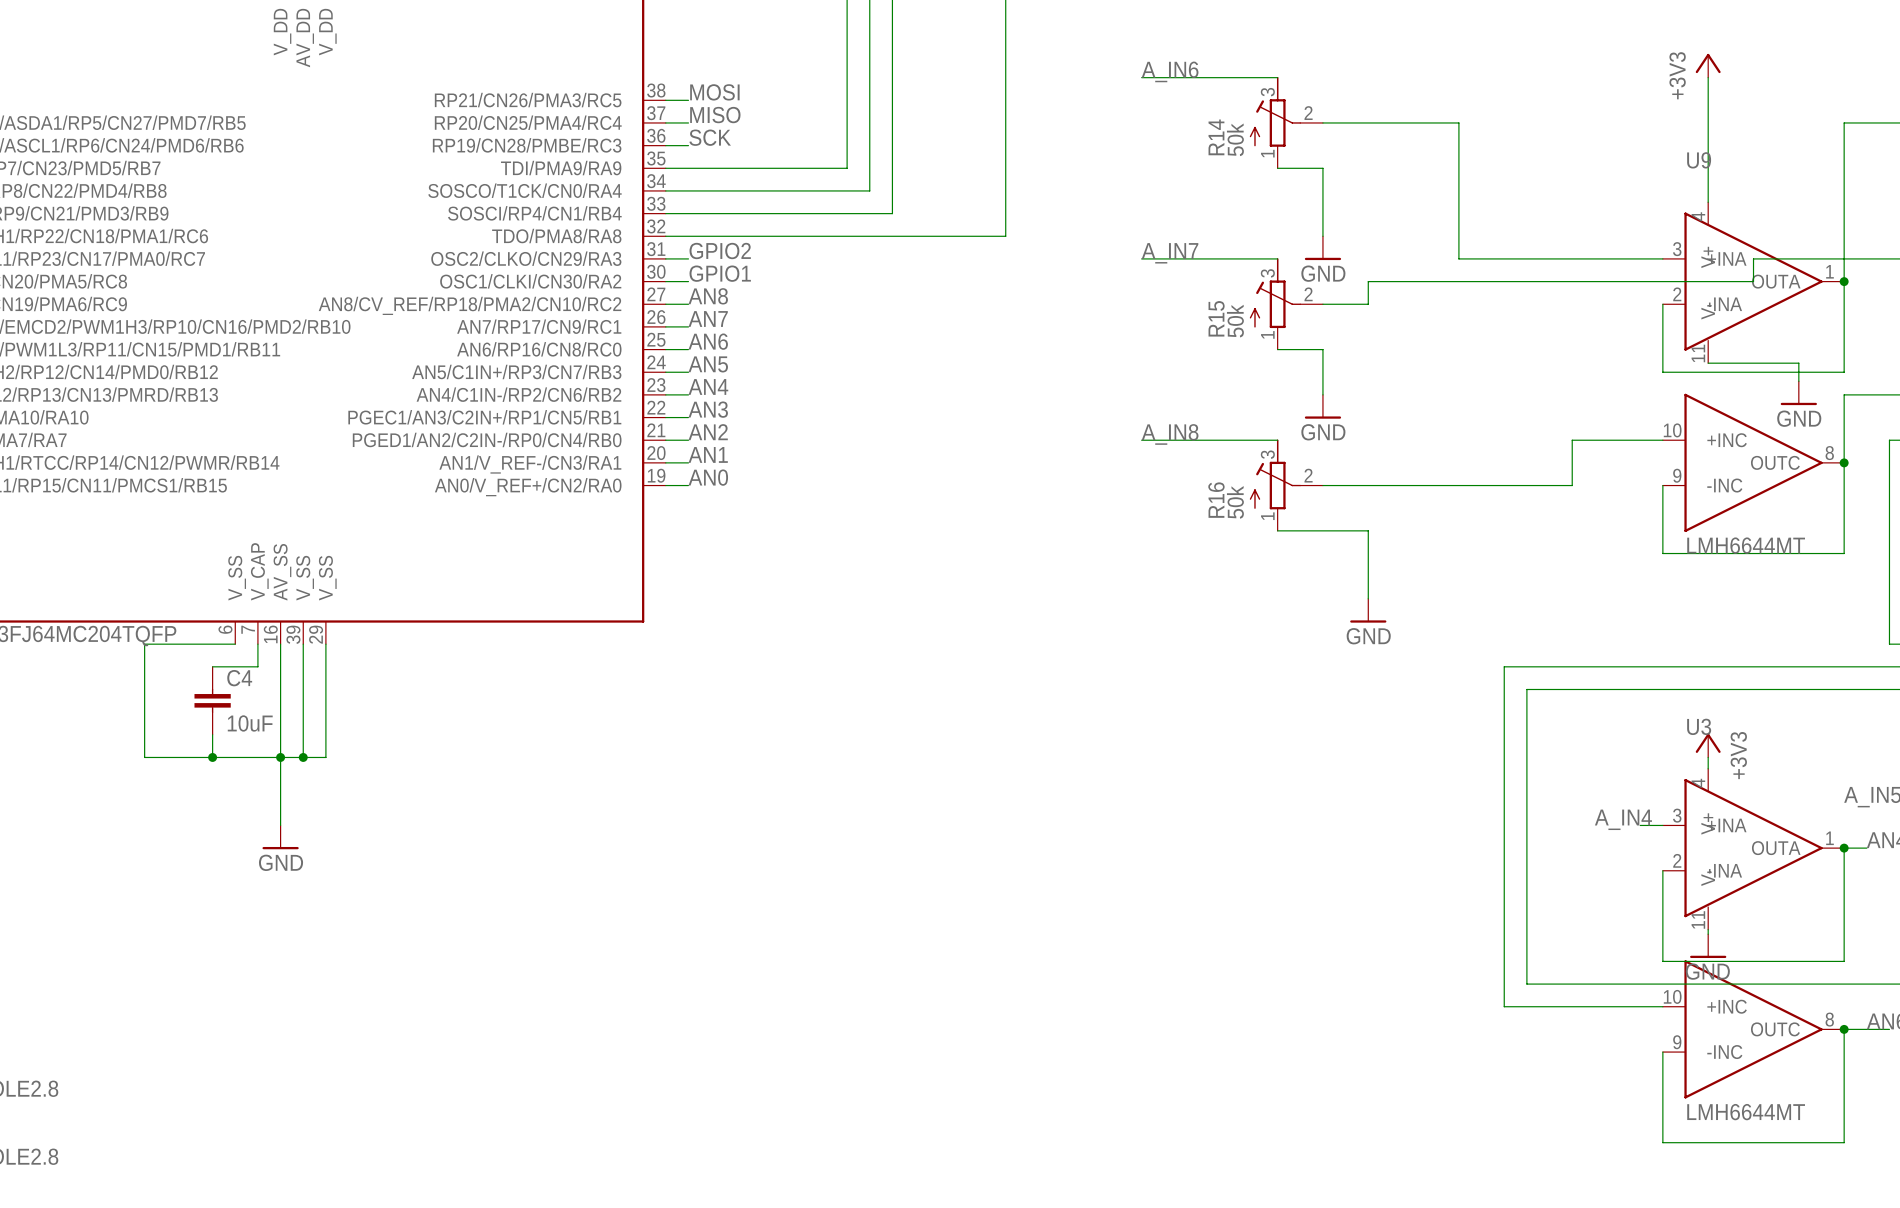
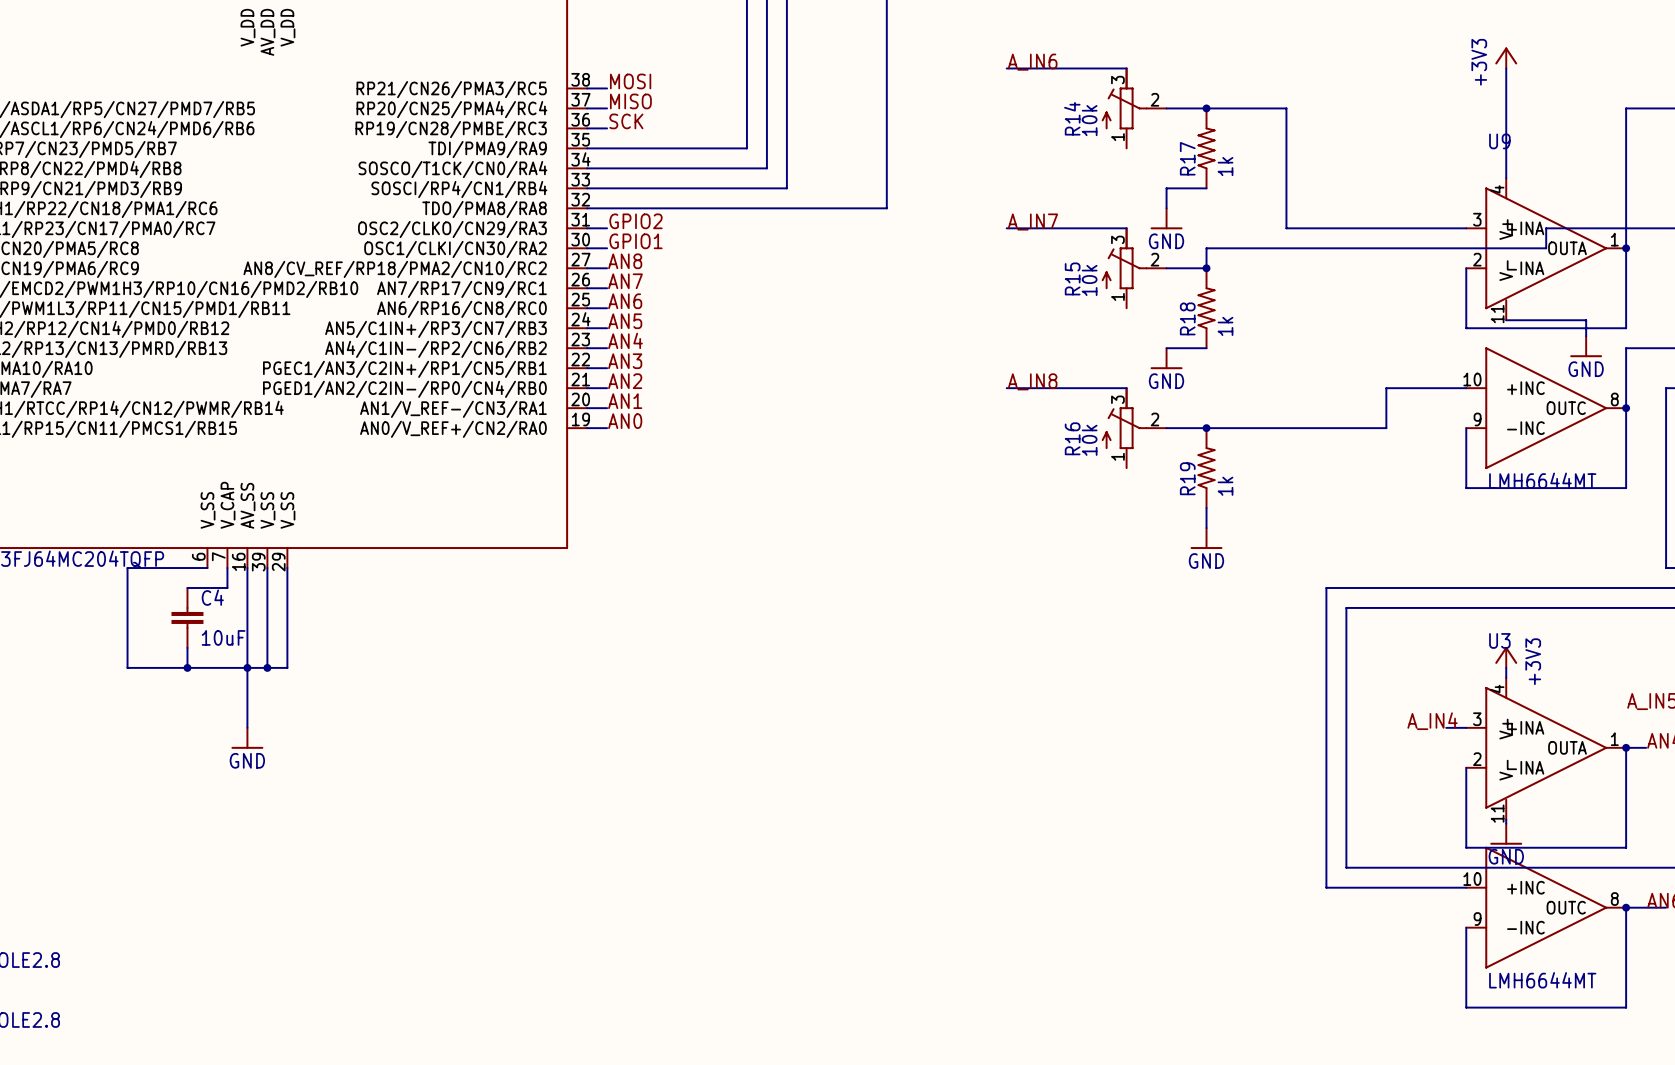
junction: none -> (1206, 108)
R14 value: 50k (1235, 139) -> 10k (1089, 120)
wire: (1277, 168) (1322, 168) (1322, 213) -> (1206, 188) (1166, 188)
R17: none -> 1k (1206, 148)
junction: none -> (1206, 268)
R15 value: 50k (1235, 321) -> 10k (1089, 280)
wire: (1277, 349) (1322, 349) (1322, 394) -> (1206, 348) (1166, 348)
R18: none -> 1k (1206, 308)
junction: none -> (1206, 428)
R16 value: 50k (1235, 502) -> 10k (1089, 440)
wire: (1277, 530) (1368, 530) (1368, 576) -> none
R19: none -> 1k (1206, 468)

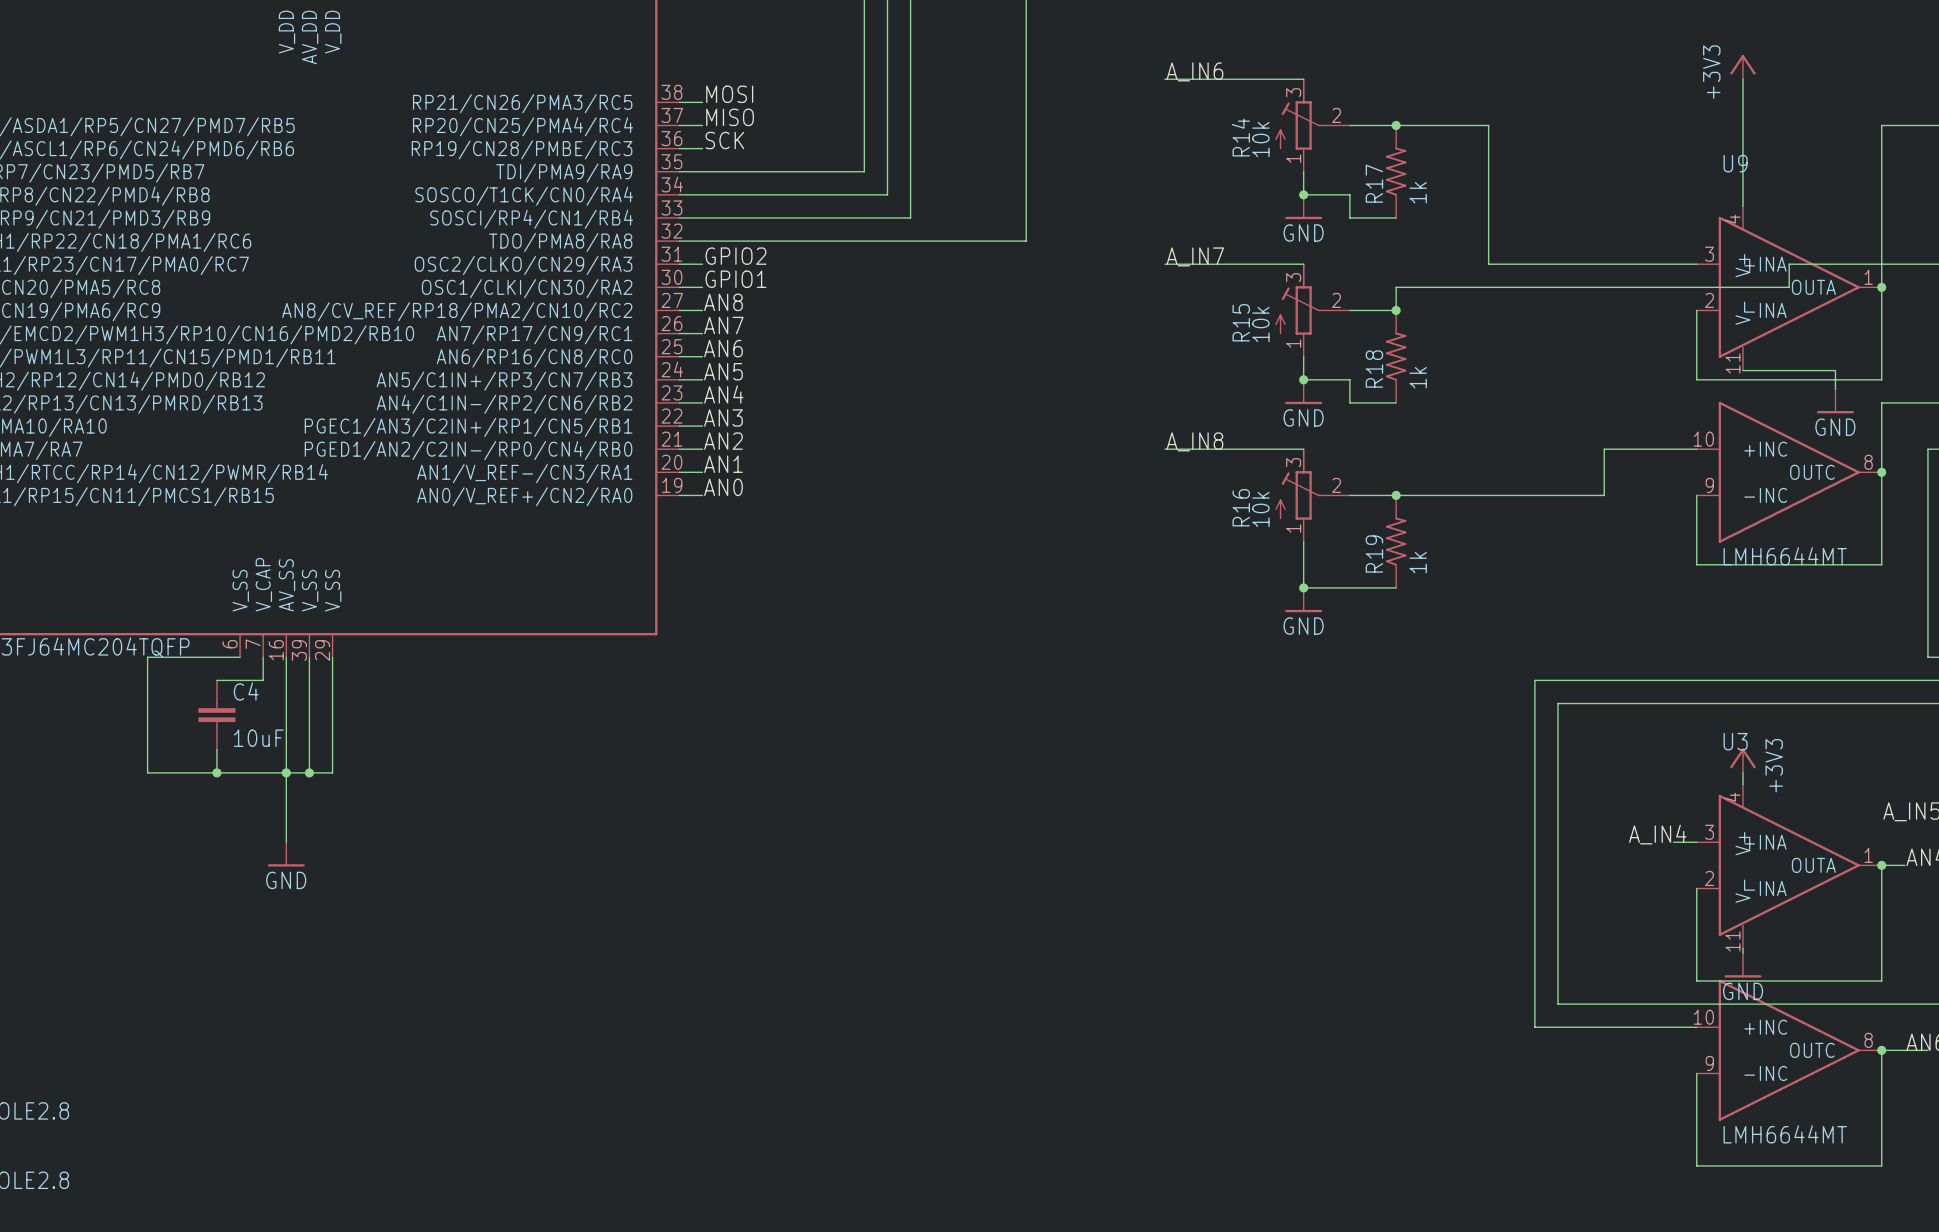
junction: none -> (1303, 194)
wire: (1166, 188) (1166, 208) -> (1349, 217) (1349, 194) (1303, 194) (1303, 171)
power symbol position: GND (1166, 218) -> GND (1303, 206)
wire: none -> (1303, 356) (1303, 379) (1349, 379) (1349, 402)
junction: none -> (1303, 379)
power symbol position: GND (1166, 358) -> GND (1303, 391)
junction: none -> (1303, 587)
wire: (1206, 508) (1206, 528) -> (1396, 587) (1303, 587) (1303, 541)
power symbol: none -> GND (1303, 600)
power symbol: GND (1206, 538) -> none

